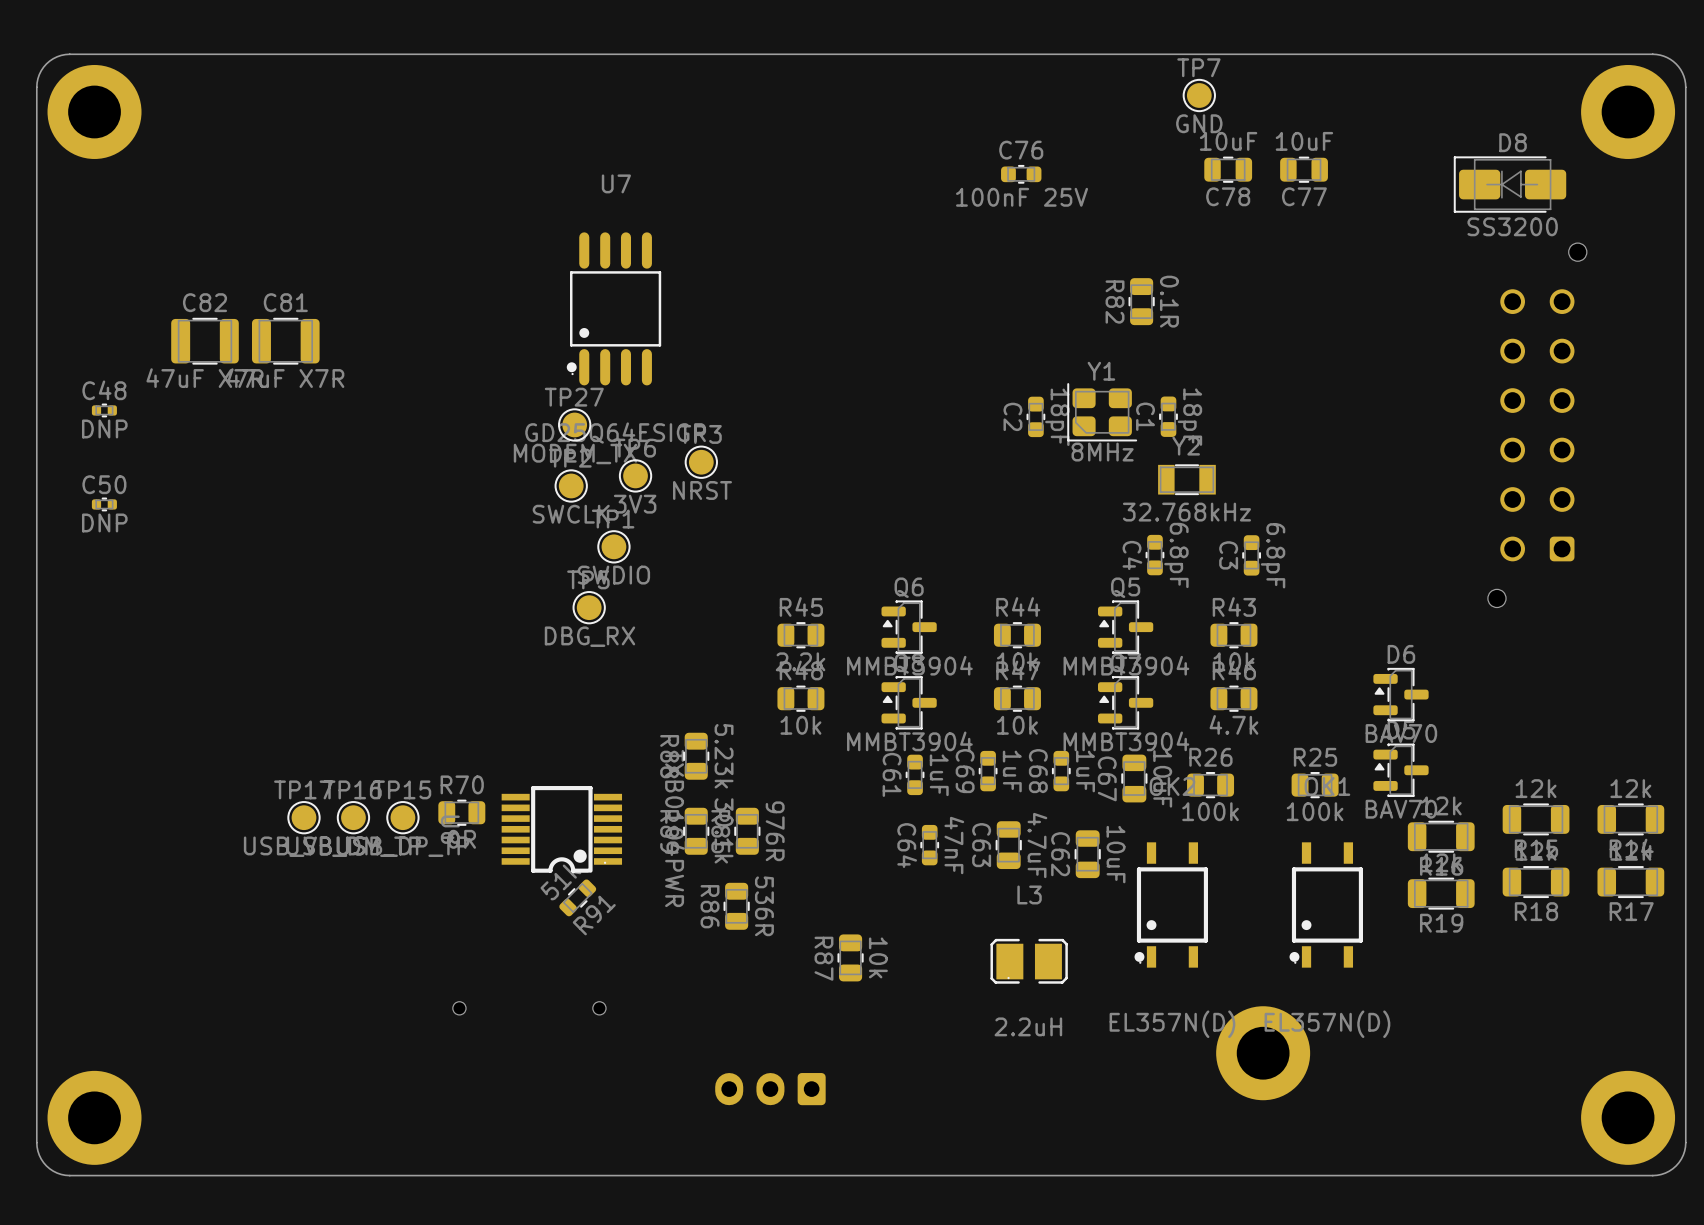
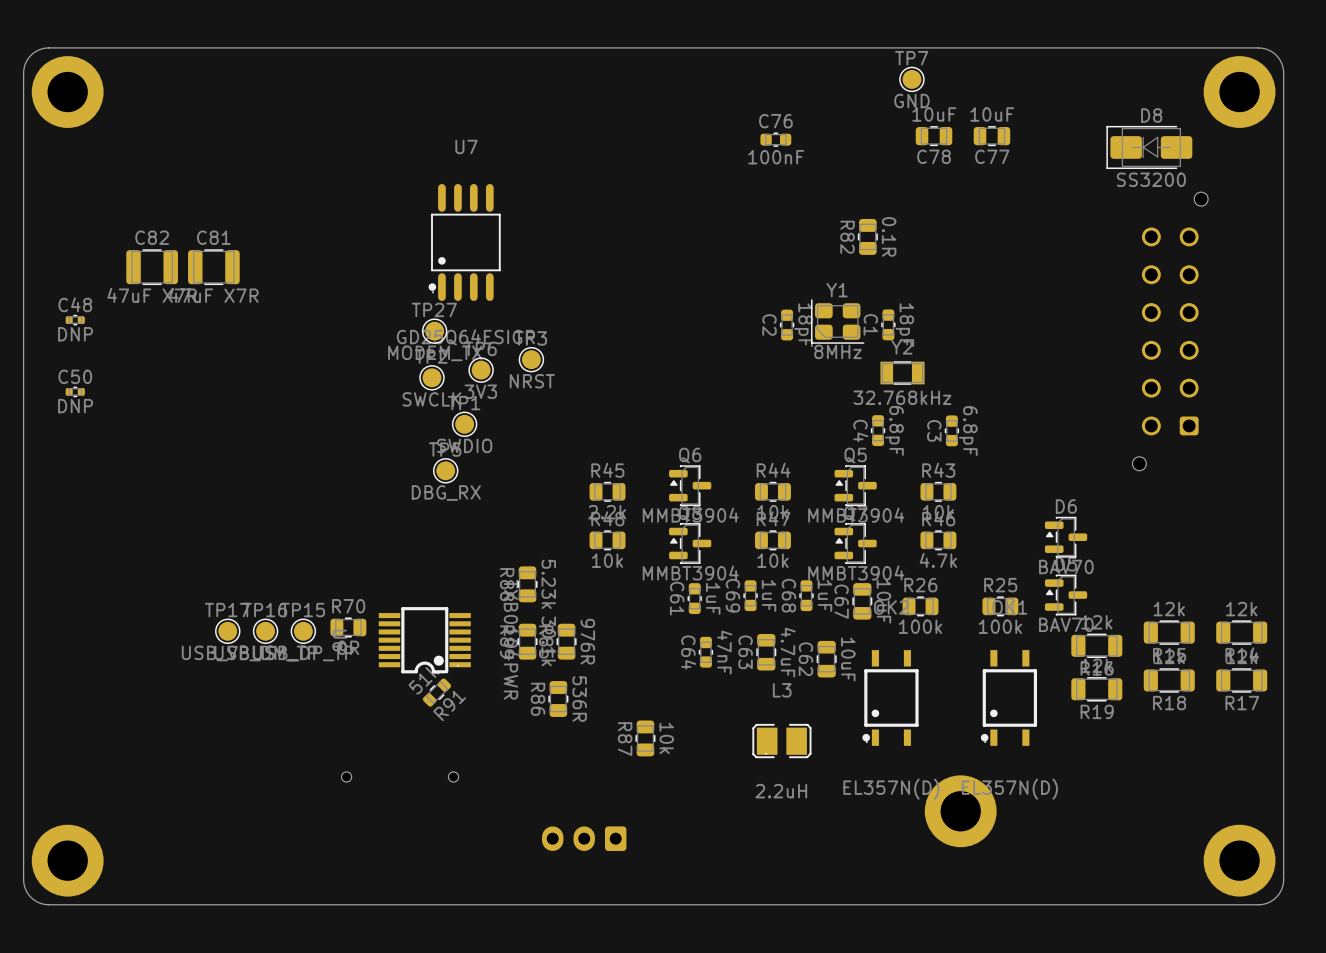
C76 value: 100nF 25V (1022, 197) -> 100nF (776, 157)

